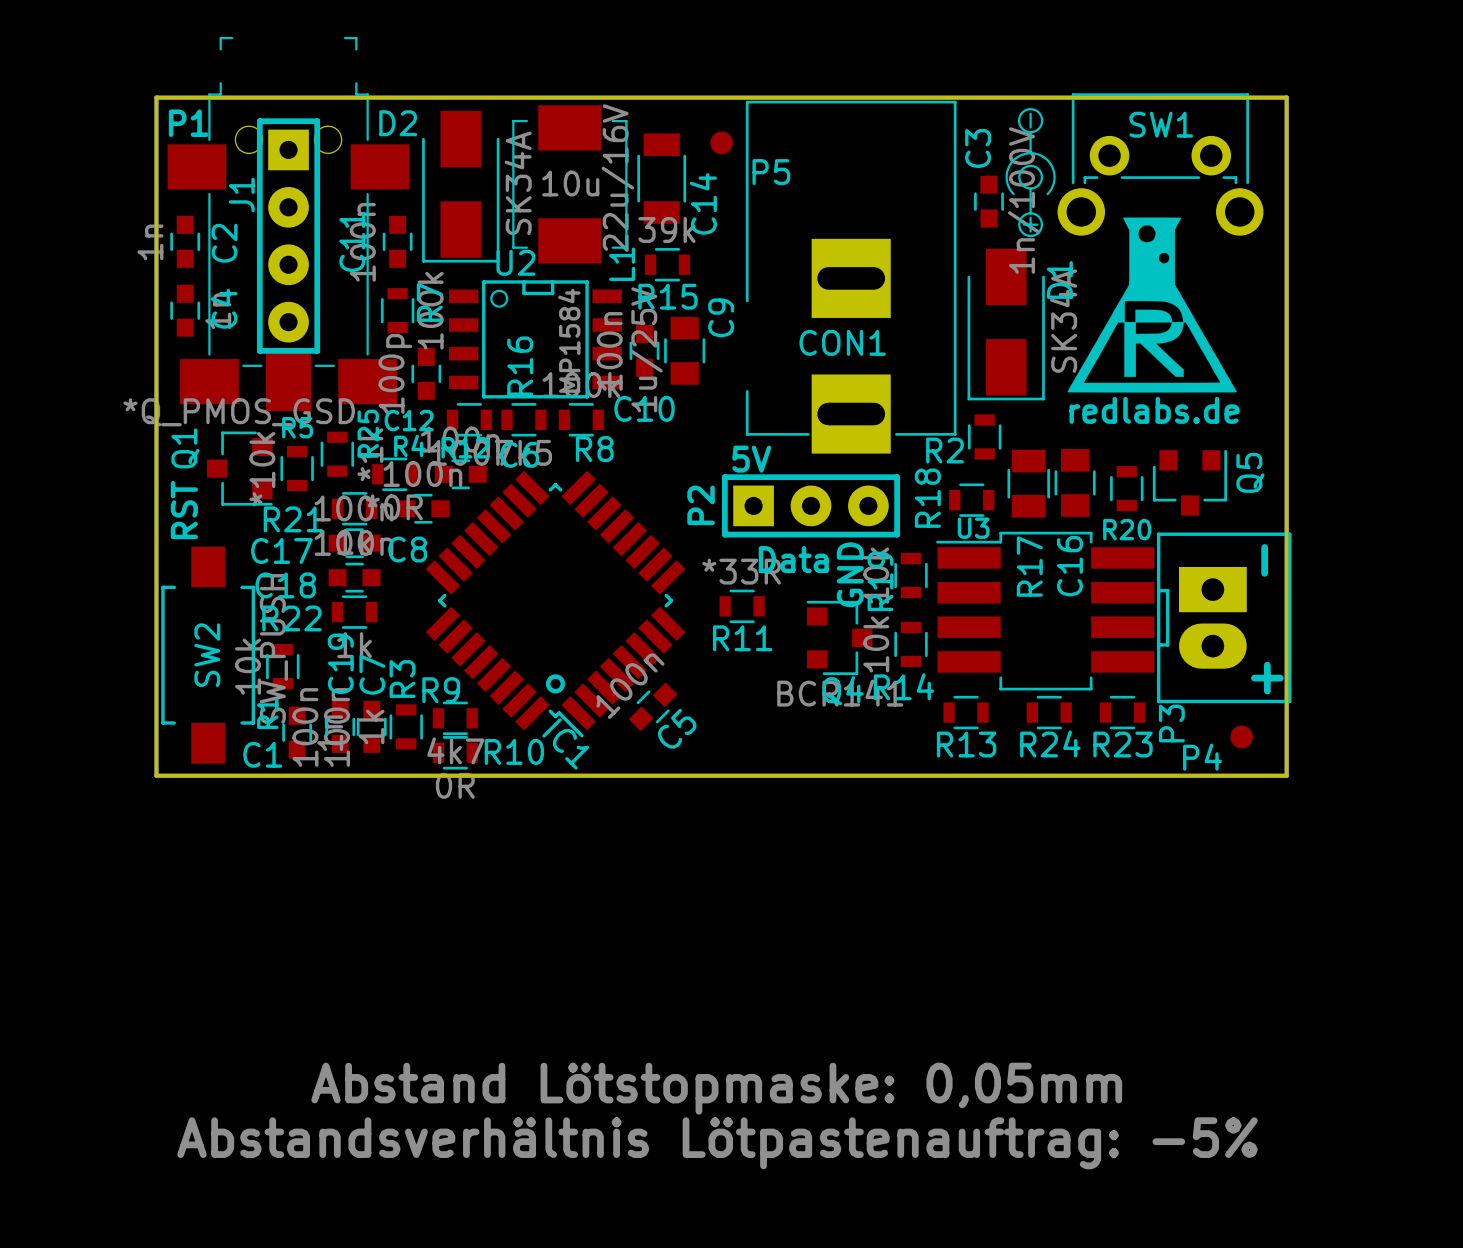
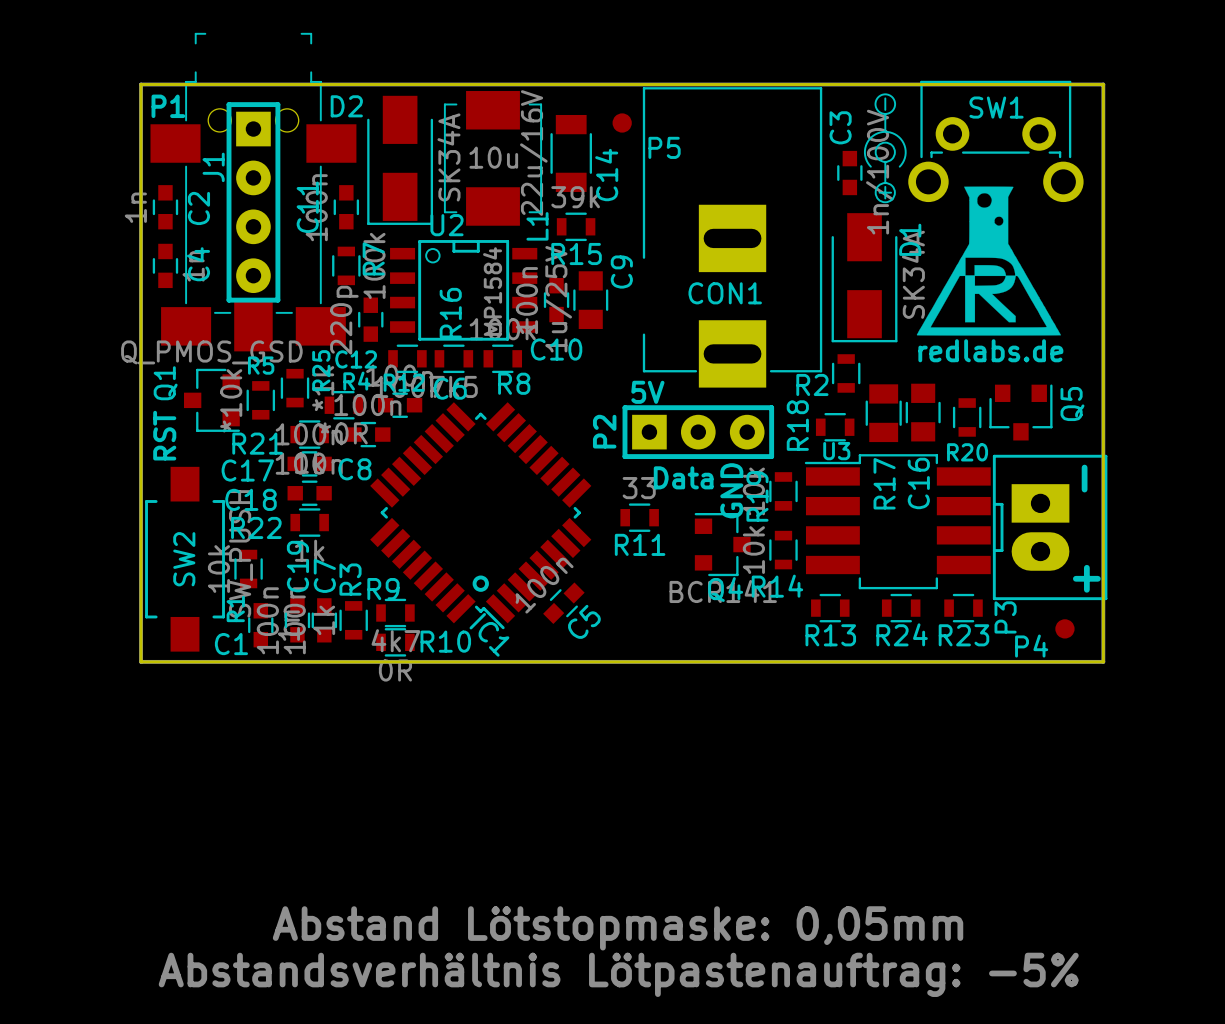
C12 value: 100p (395, 373) -> 220p (344, 320)
Q1 value: *Q_PMOS_GSD (239, 412) -> Q_PMOS_GSD (211, 352)
R11 value: *33R (741, 571) -> 33 (639, 488)

